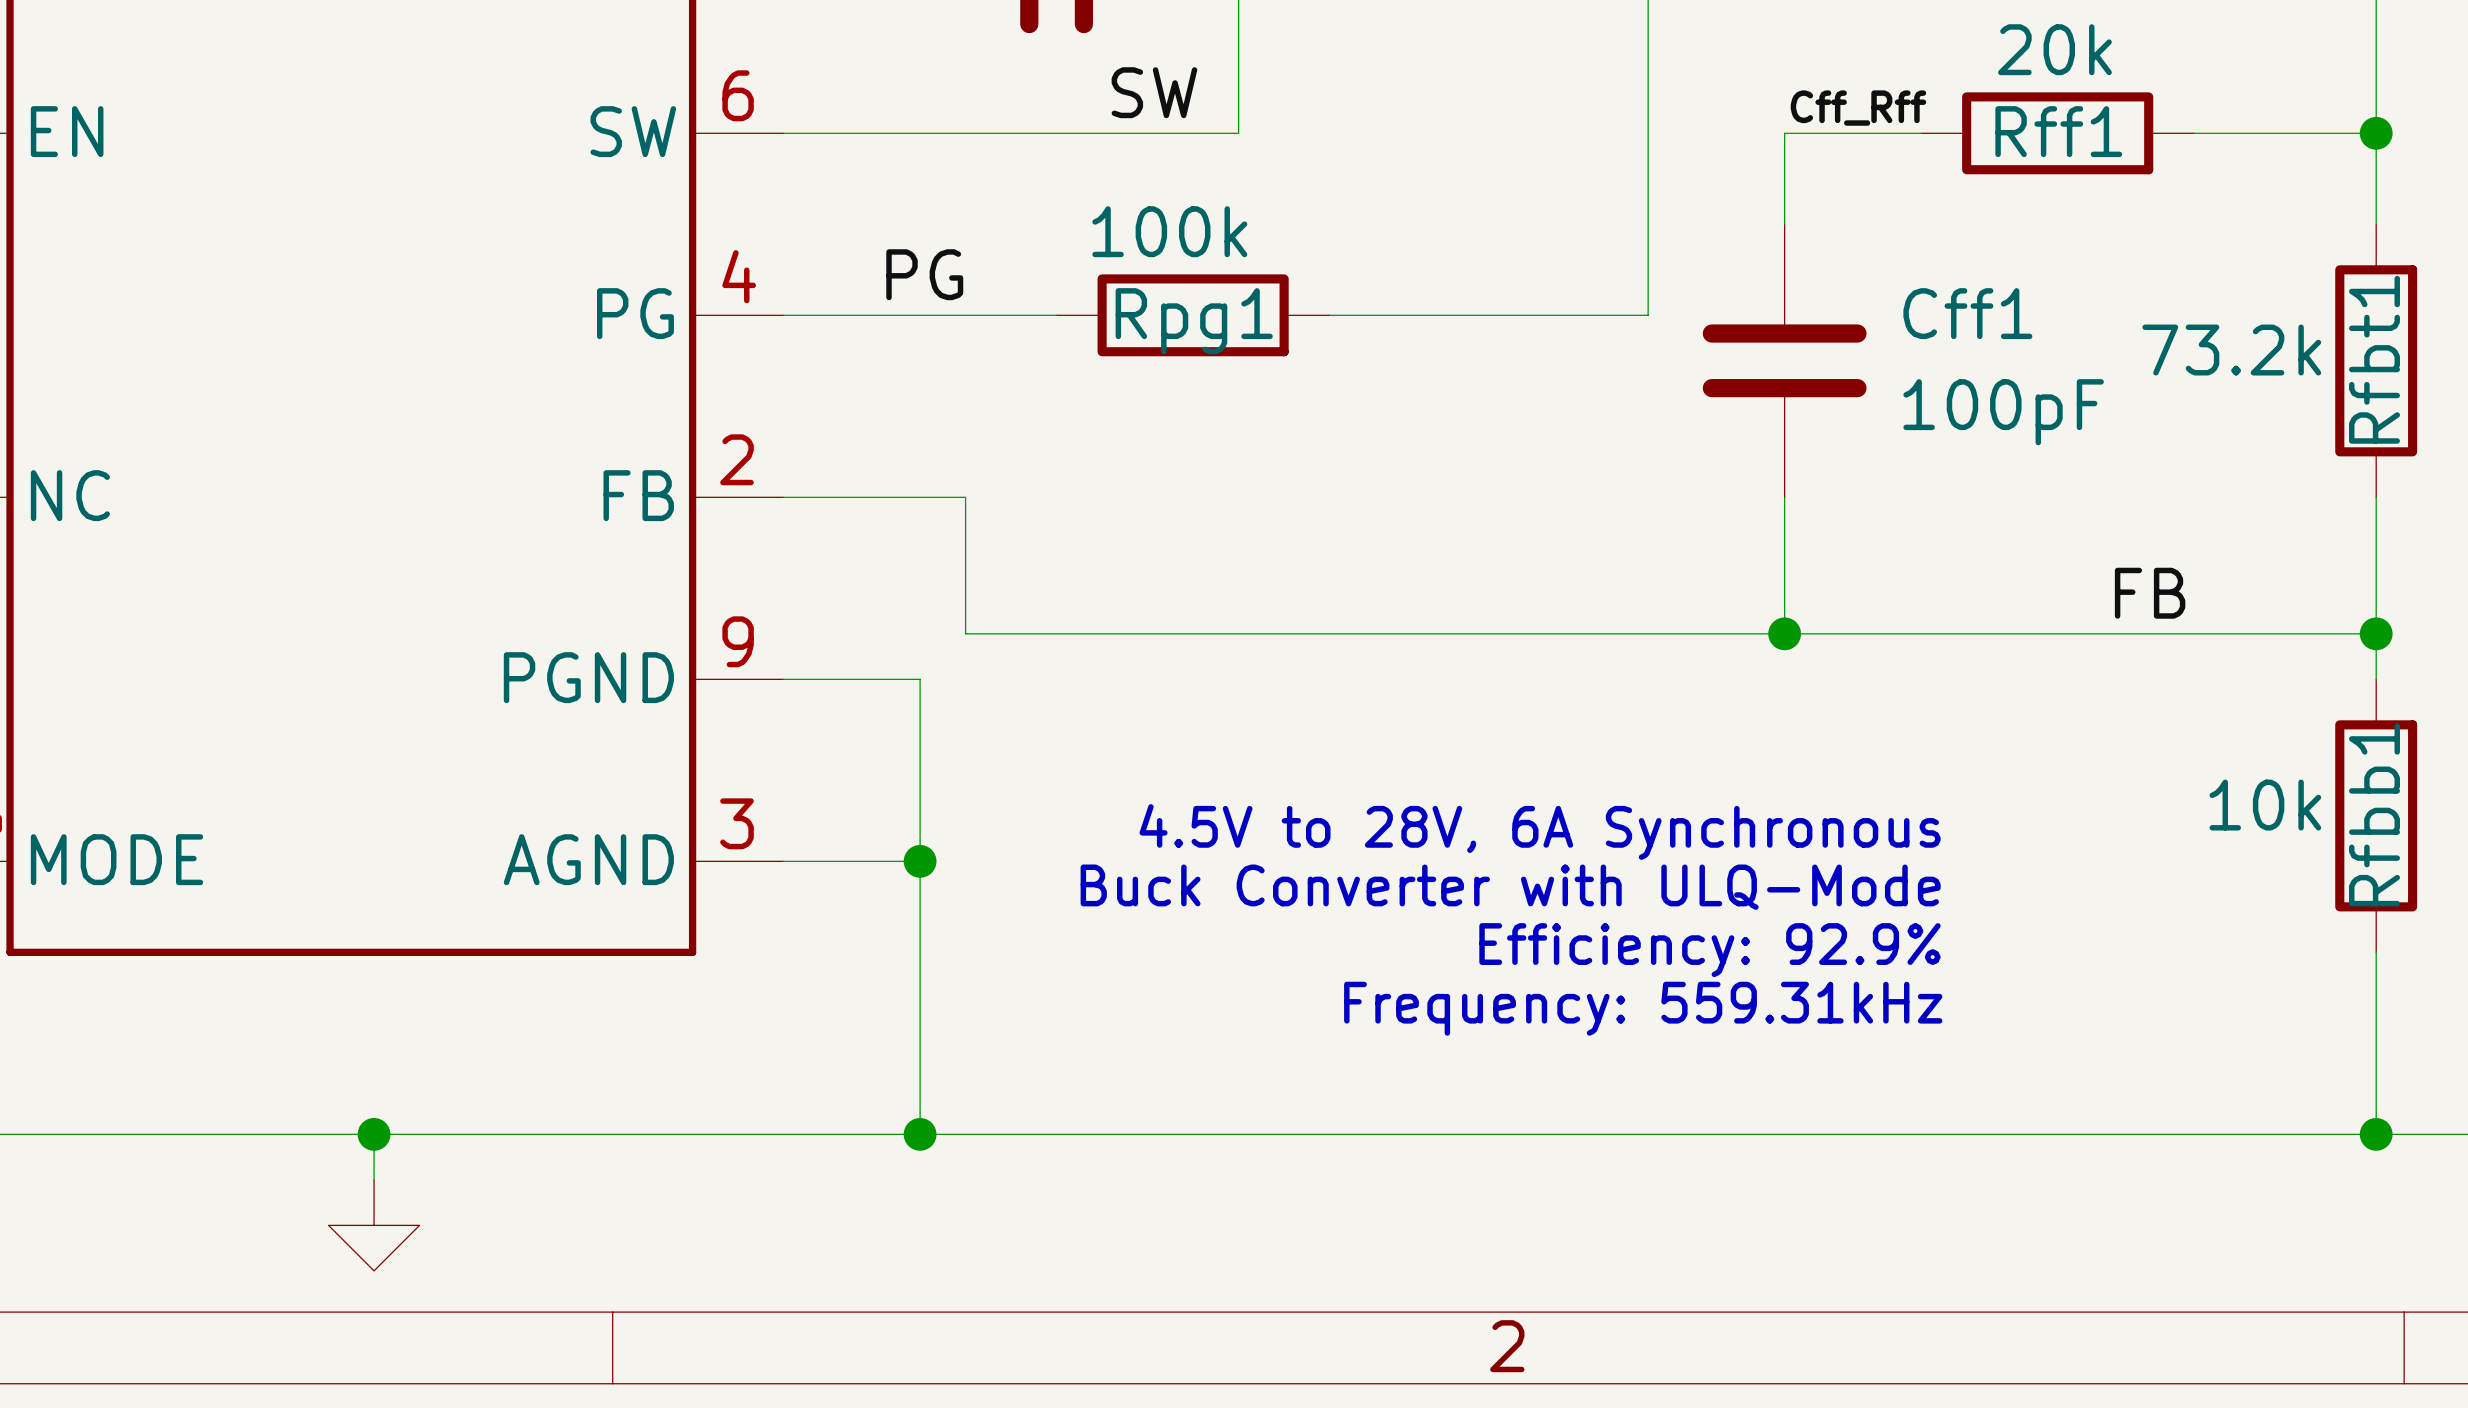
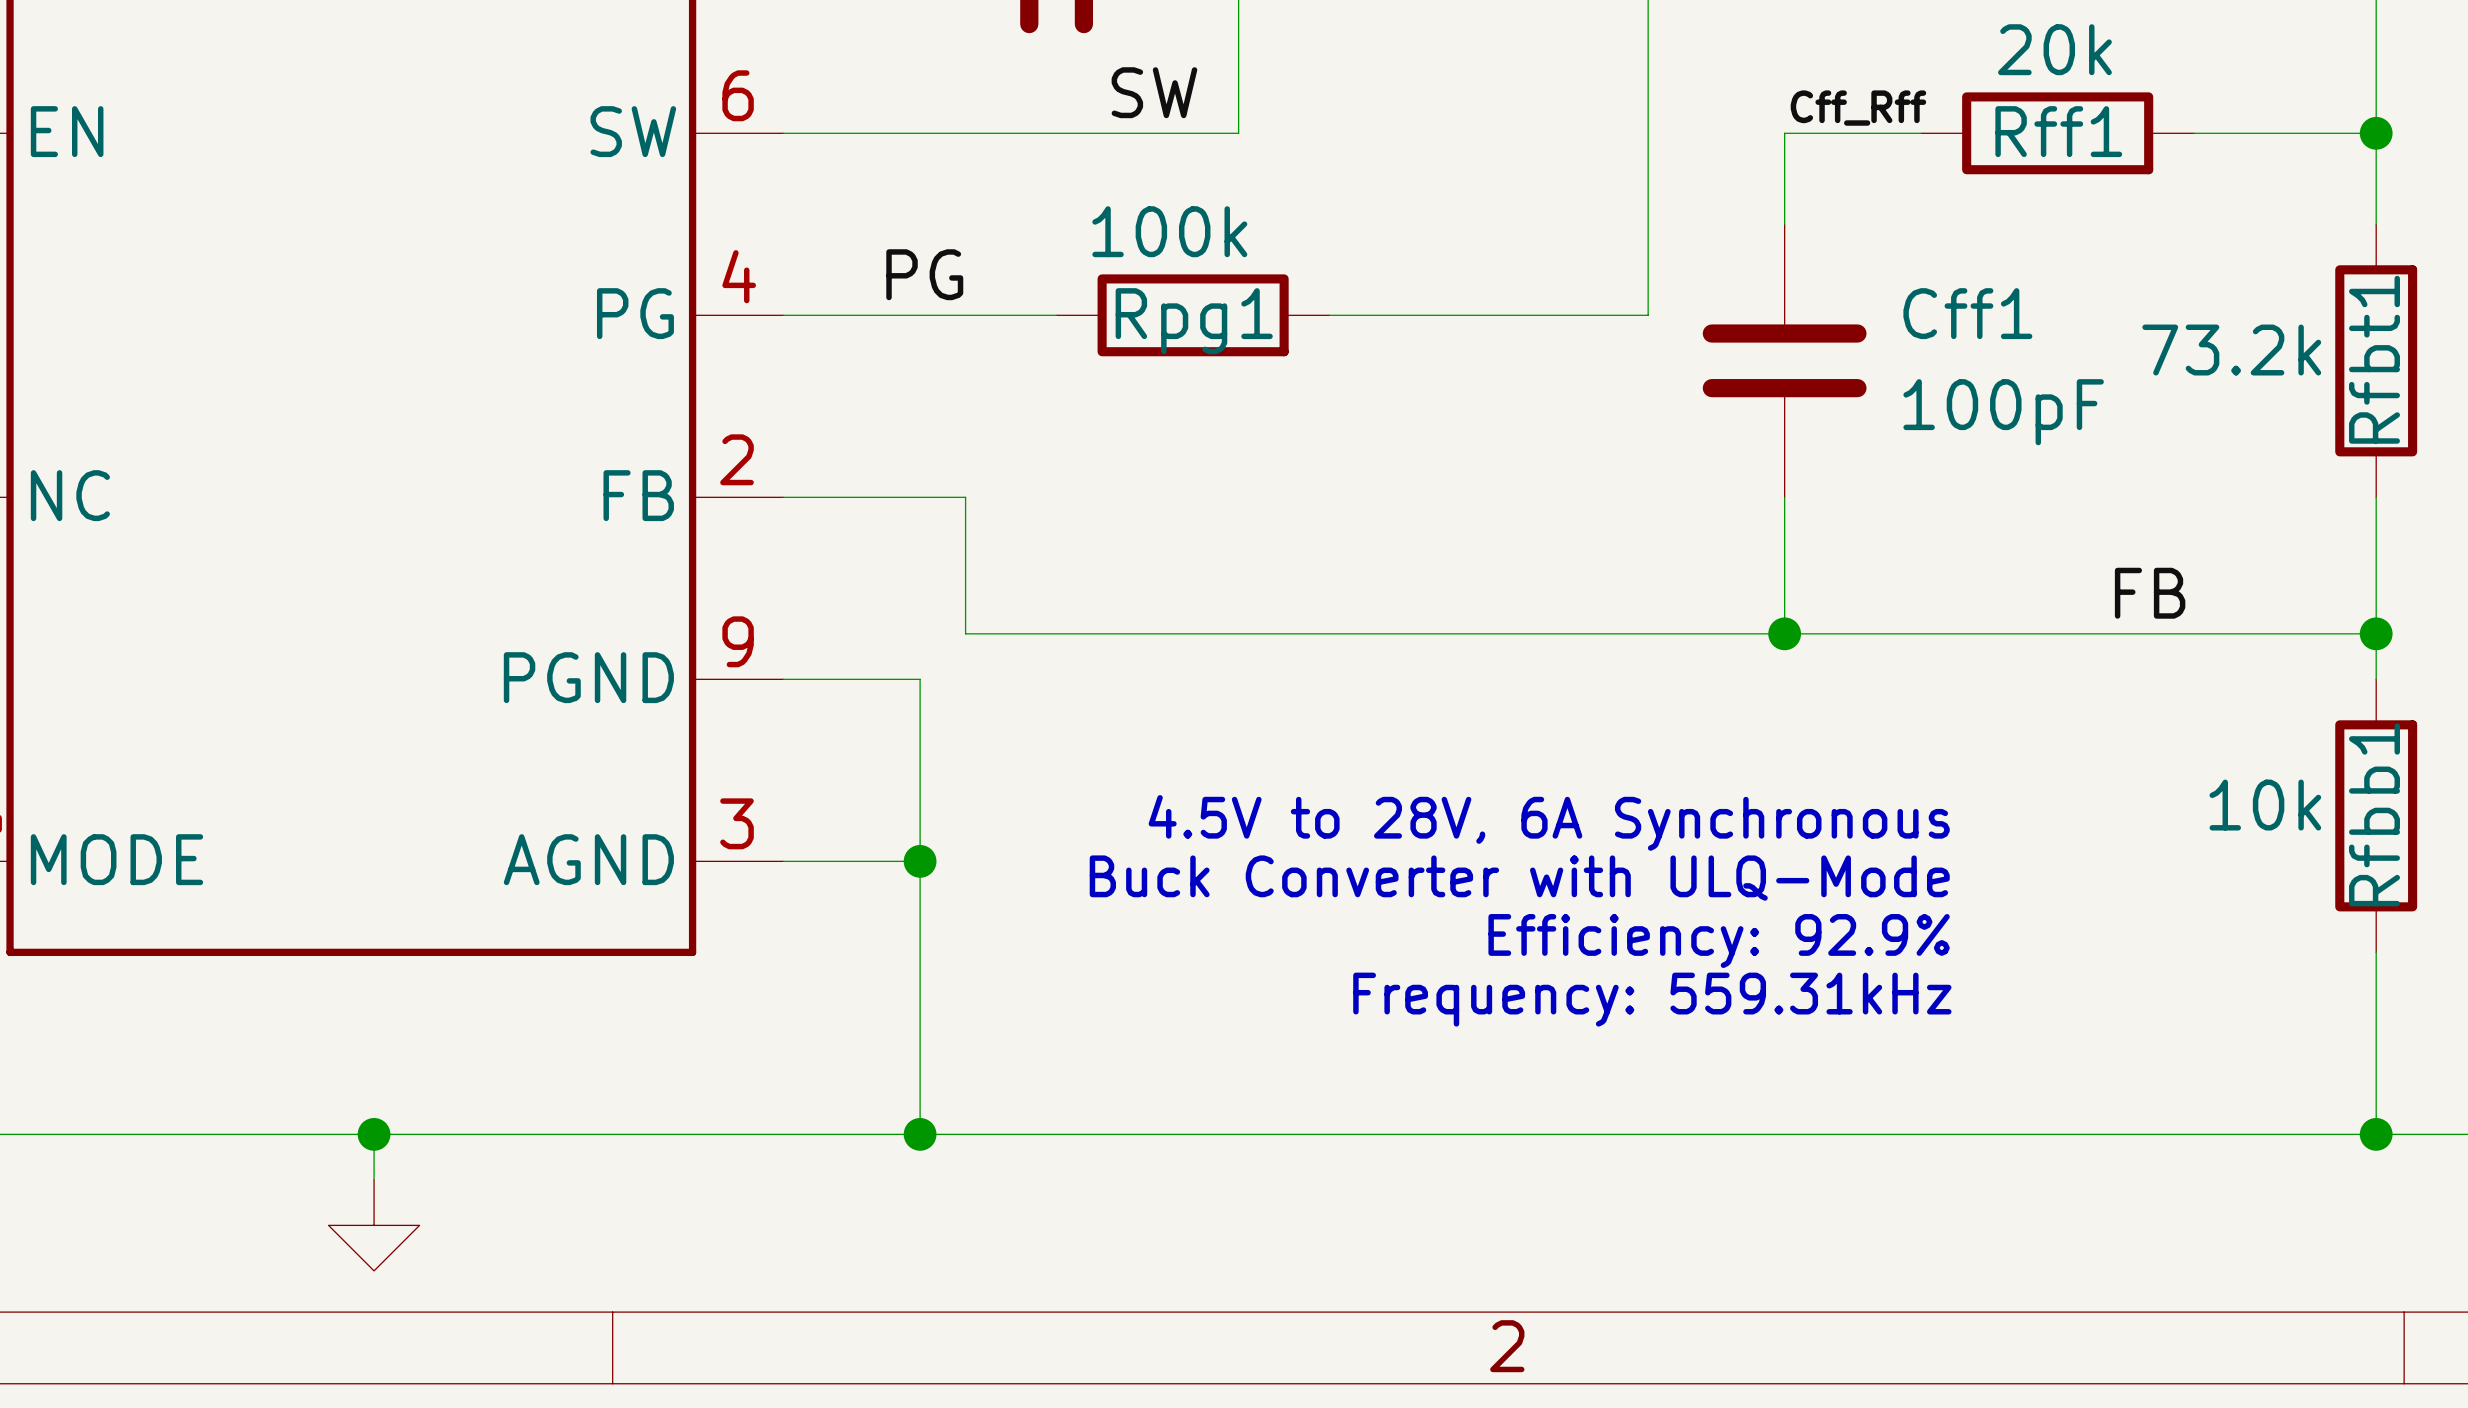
text position: 4.5V to 28V, 6A Synchronous (1540, 832) -> 4.5V to 28V, 6A Synchronous (1549, 822)
text position: Buck Converter with ULQ-Mode (1510, 887) -> Buck Converter with ULQ-Mode (1519, 878)
text position: Efficiency: 92.9% (1709, 950) -> Efficiency: 92.9% (1719, 941)
text position: Frequency: 559.31kHz (1643, 1008) -> Frequency: 559.31kHz (1652, 999)

